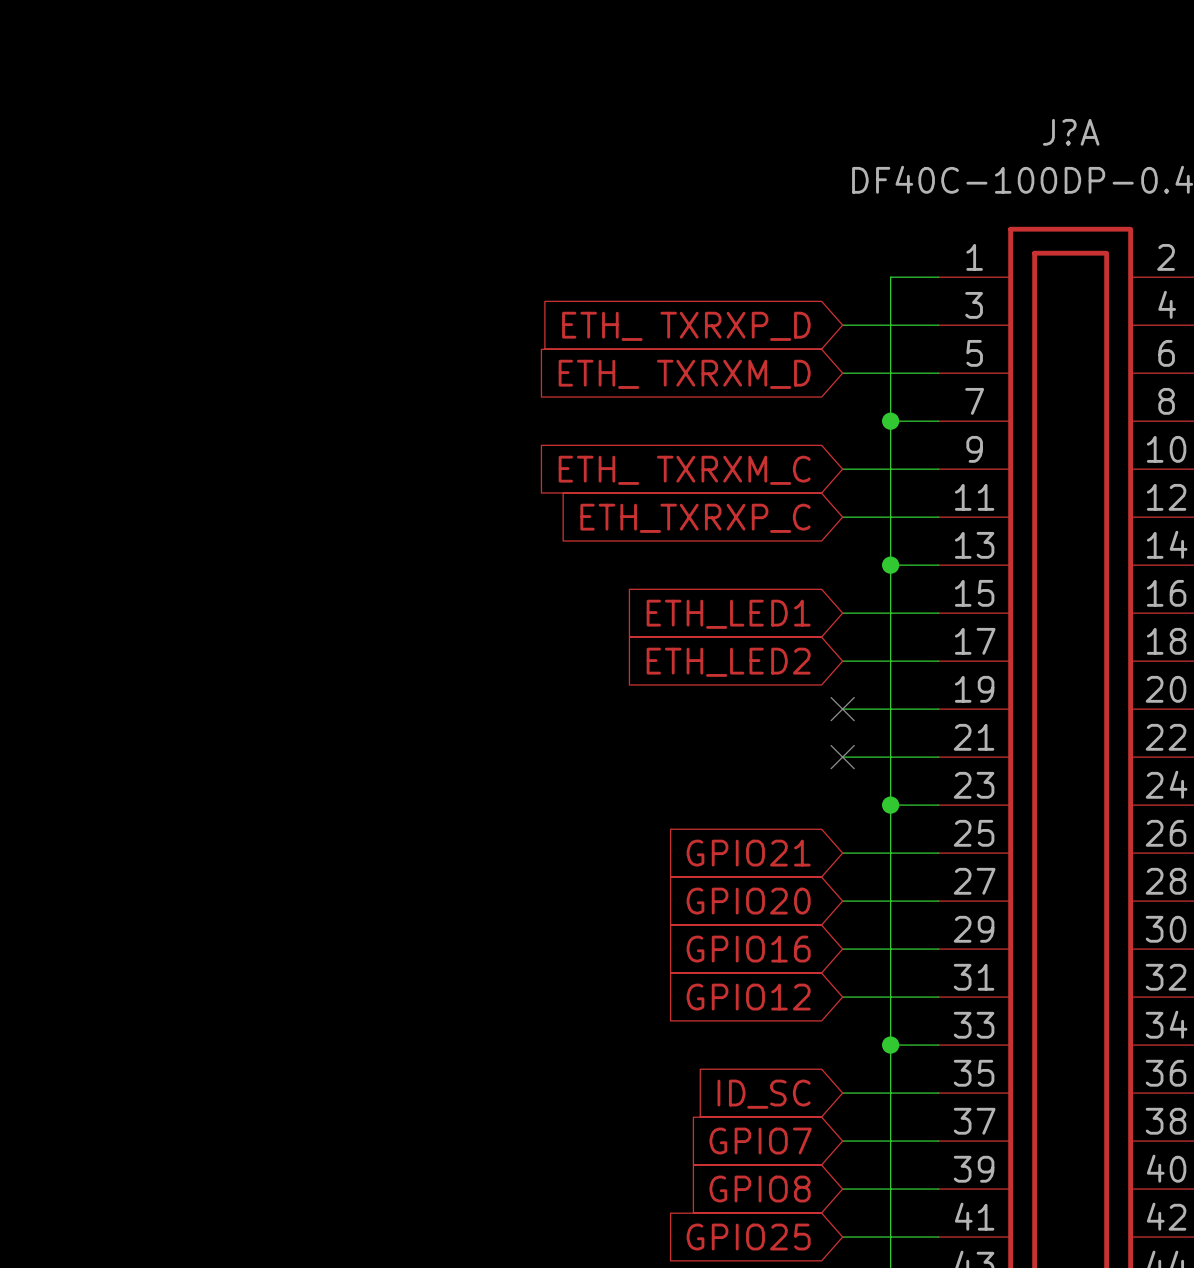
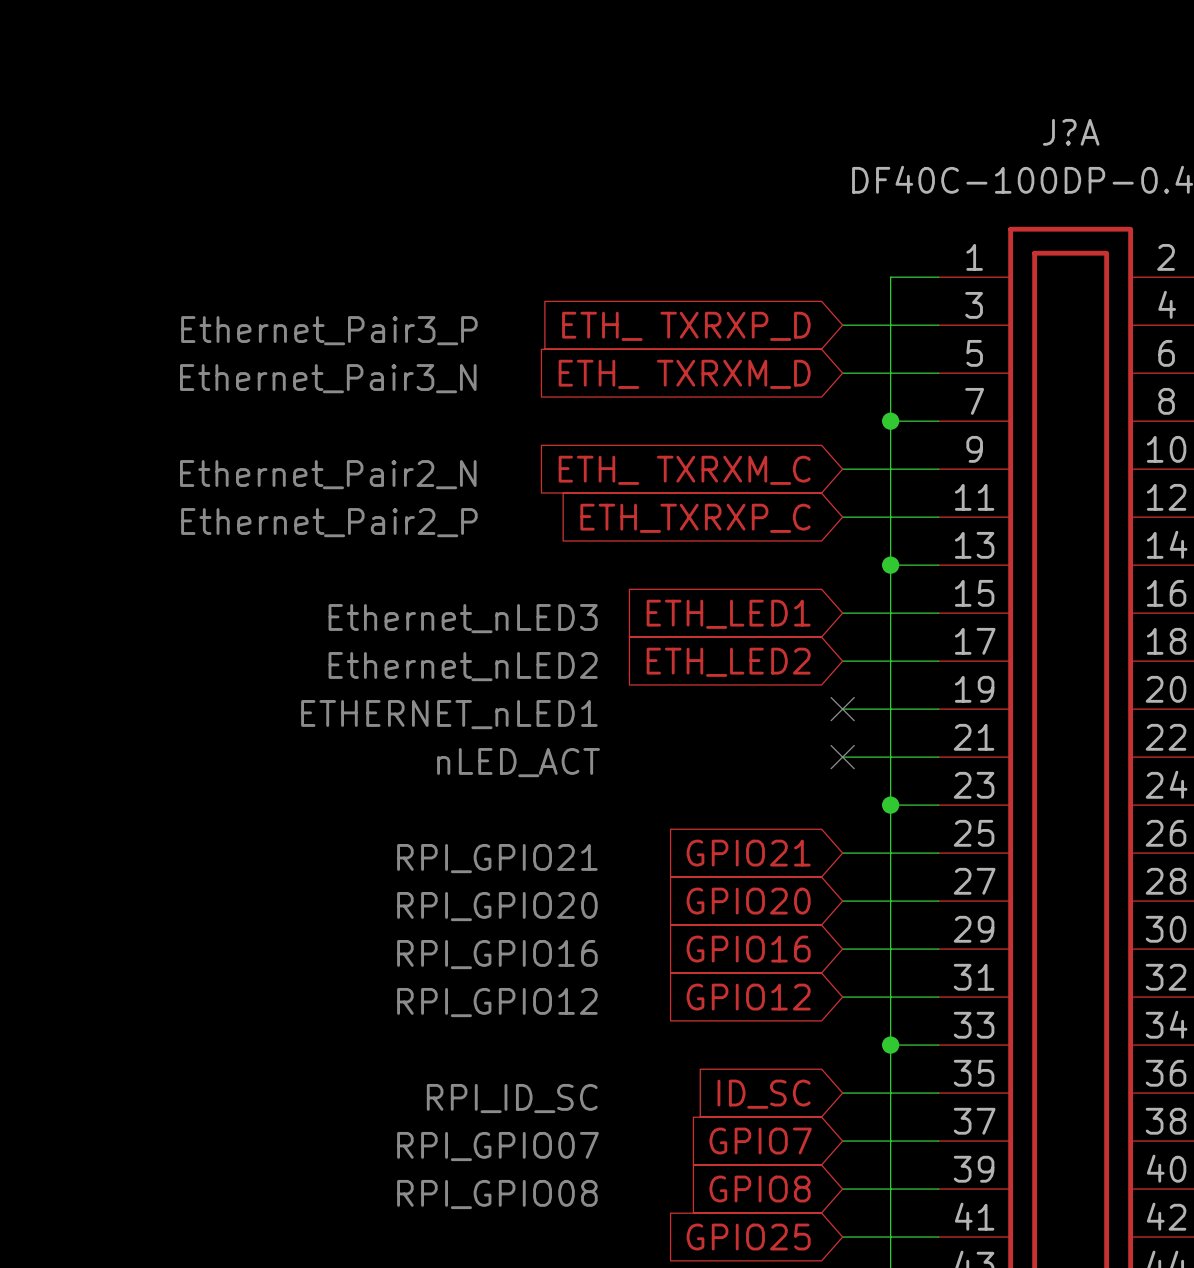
text: none -> Ethernet_Pair3_P (329, 330)
text: none -> Ethernet_Pair3_N (328, 378)
text: none -> Ethernet_Pair2_N (328, 474)
text: none -> Ethernet_Pair2_P (329, 522)
text: none -> Ethernet_nLED3 (463, 618)
text: none -> Ethernet_nLED2 (463, 666)
text: none -> ETHERNET_nLED1 (449, 714)
text: none -> nLED_ACT (518, 762)
text: none -> RPI_GPIO21 (497, 858)
text: none -> RPI_GPIO20 (497, 906)
text: none -> RPI_GPIO16 (497, 954)
text: none -> RPI_GPIO12 (497, 1002)
text: none -> RPI_ID_SC (512, 1098)
text: none -> RPI_GPIO07 (497, 1146)
text: none -> RPI_GPIO08 (497, 1194)

